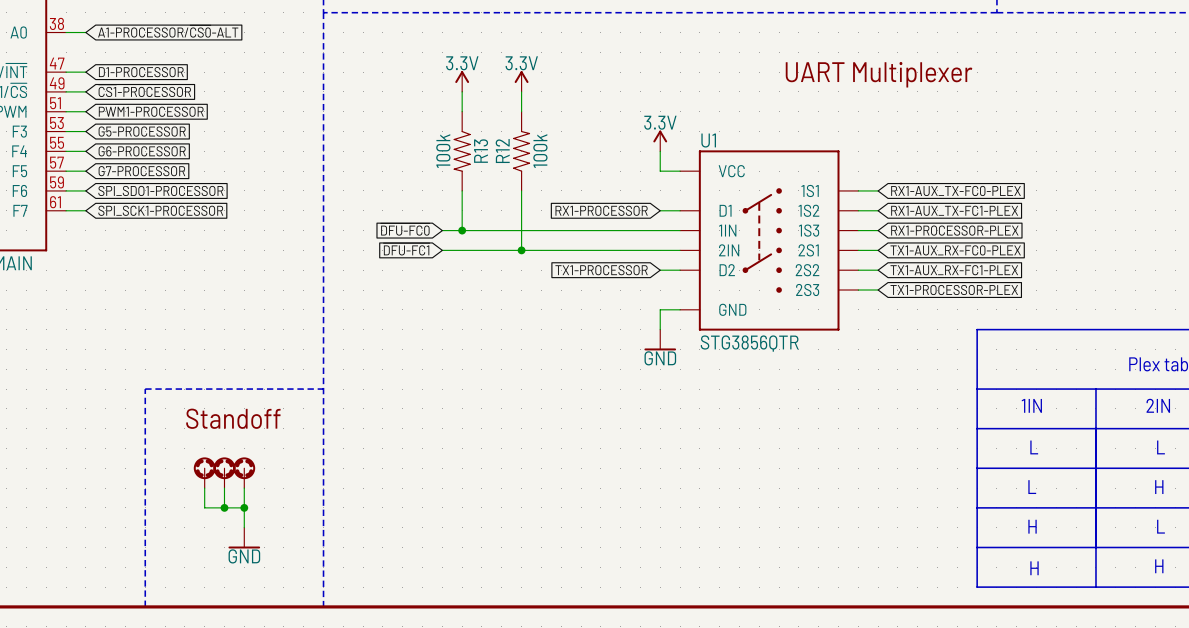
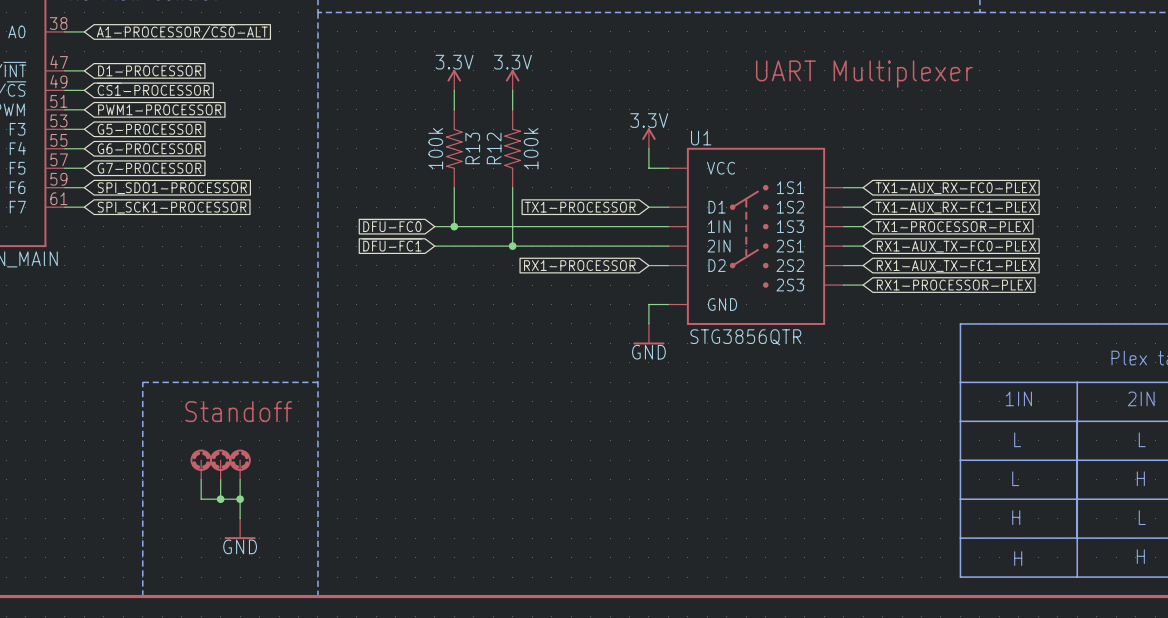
global label: RX1-AUX_TX-FC0-PLEX (956, 190) -> TX1-AUX_RX-FC0-PLEX (955, 188)
global label: RX1-PROCESSOR (601, 210) -> TX1-PROCESSOR (580, 207)
global label: RX1-AUX_TX-FC1-PLEX (954, 210) -> TX1-AUX_RX-FC1-PLEX (955, 207)
global label: RX1-PROCESSOR-PLEX (954, 230) -> TX1-PROCESSOR-PLEX (952, 226)
global label: TX1-AUX_RX-FC0-PLEX (955, 250) -> RX1-AUX_TX-FC0-PLEX (956, 246)
global label: TX1-PROCESSOR (601, 270) -> RX1-PROCESSOR (579, 265)
global label: TX1-AUX_RX-FC1-PLEX (954, 270) -> RX1-AUX_TX-FC1-PLEX (956, 266)
global label: TX1-PROCESSOR-PLEX (954, 290) -> RX1-PROCESSOR-PLEX (954, 285)

